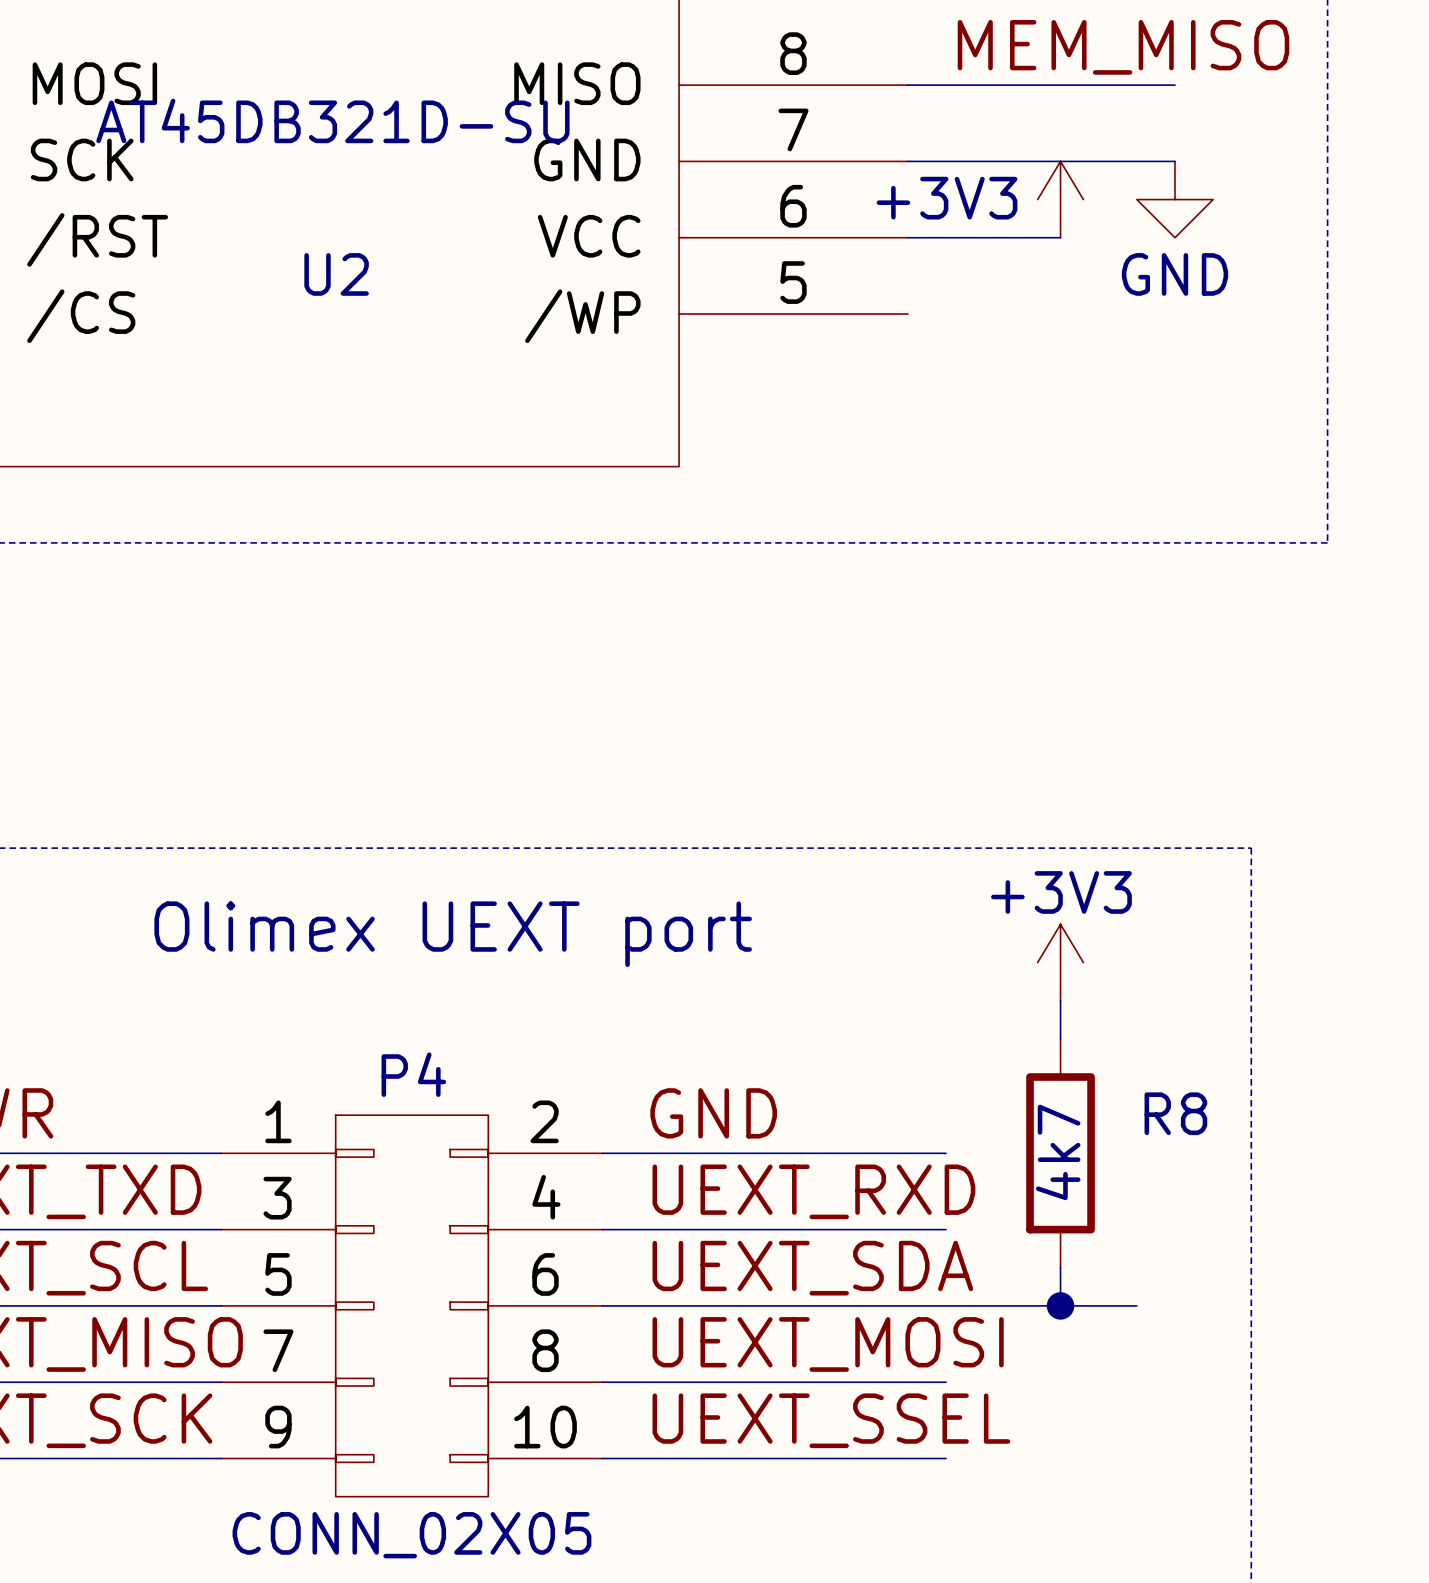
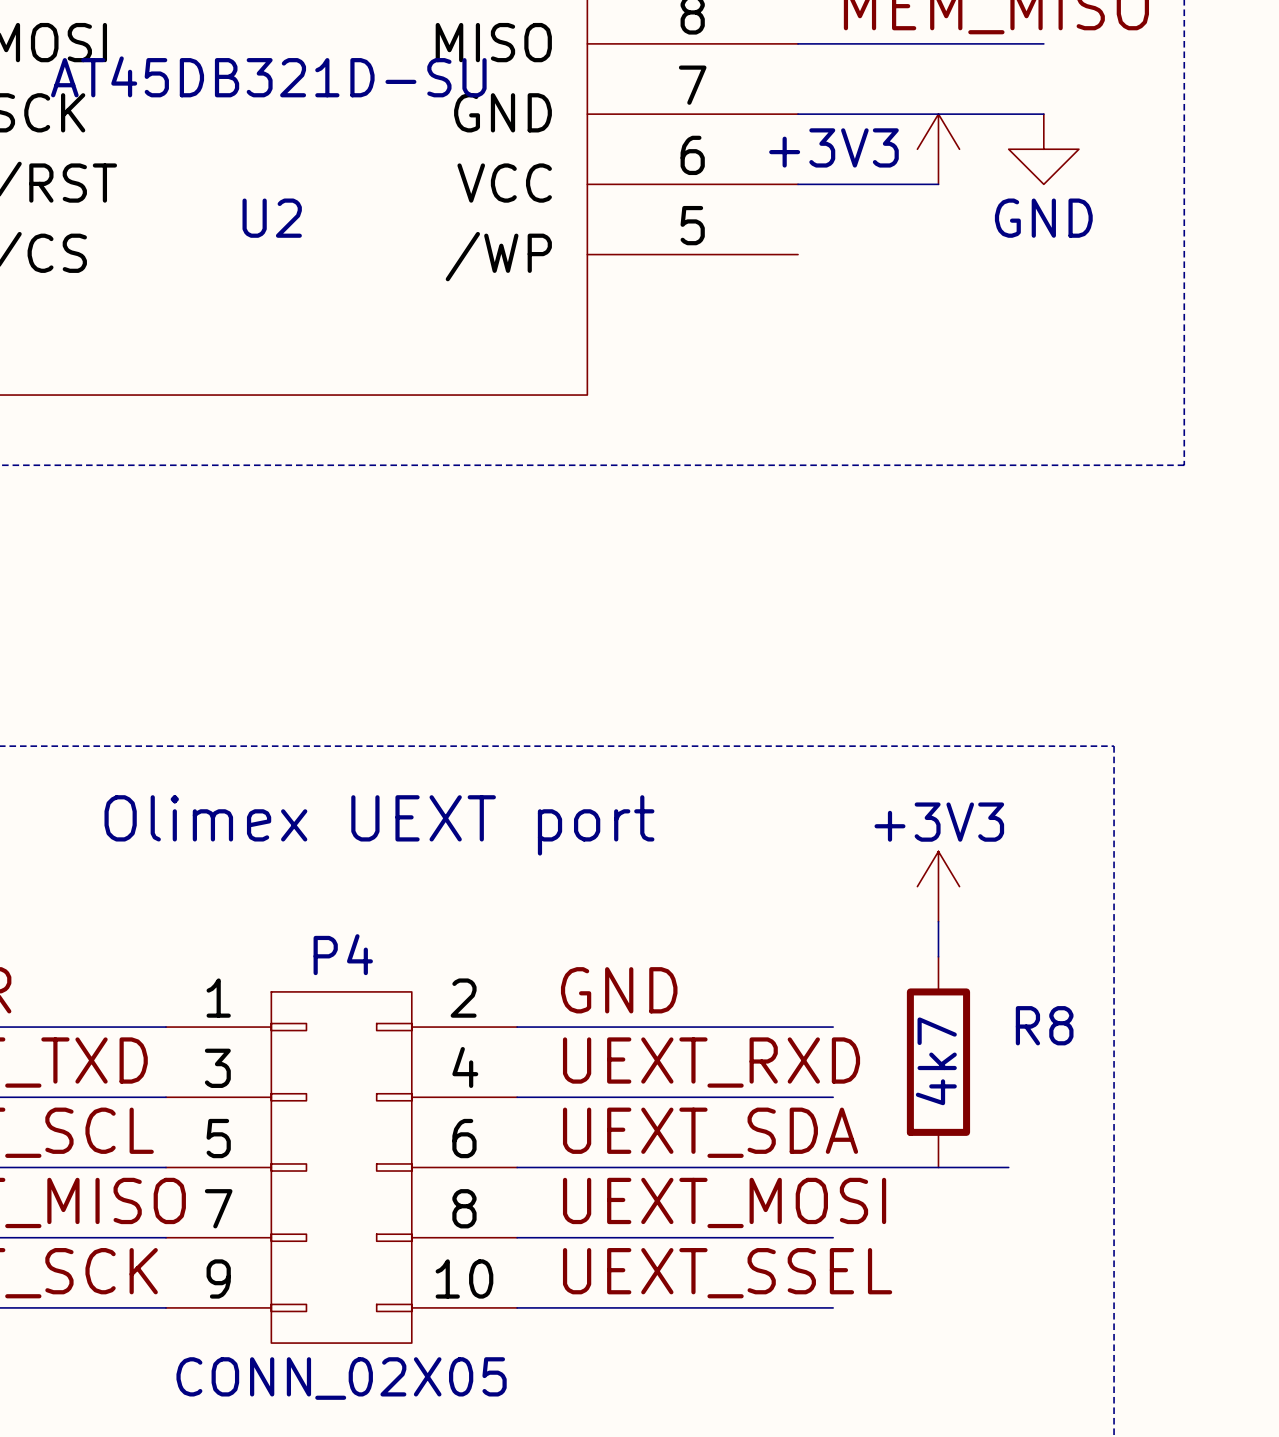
power symbol position: +3V3 (1060, 962) -> +3V3 (938, 886)
R8 position: (1060, 1153) -> (938, 1062)
junction: (1060, 1305) -> none

